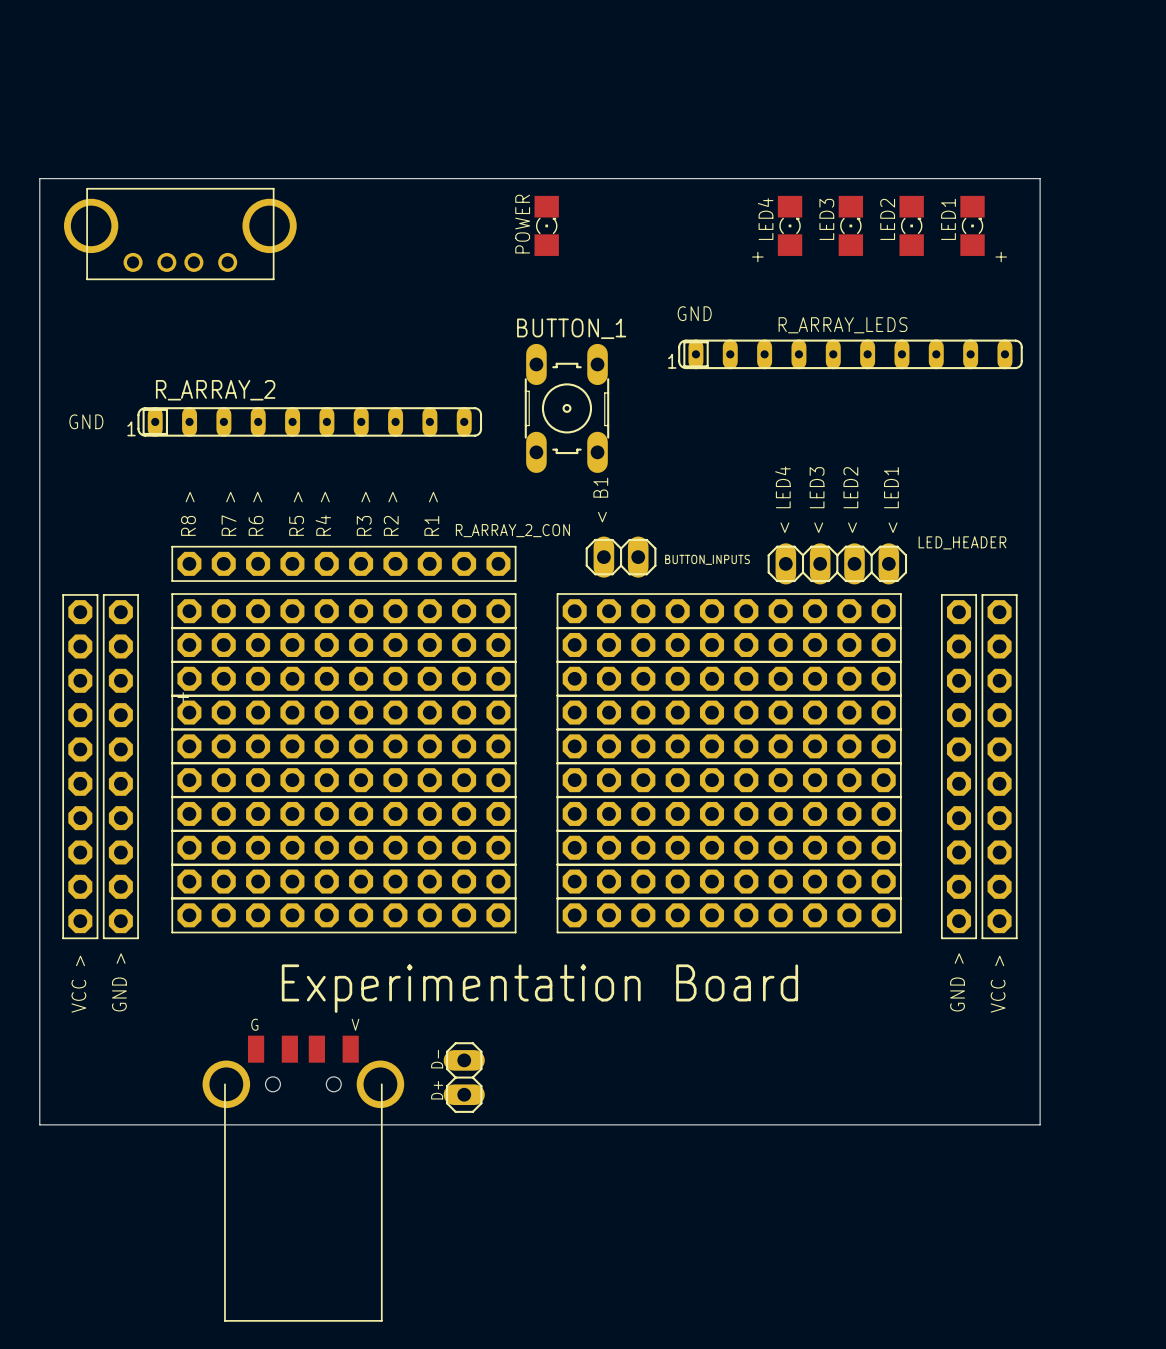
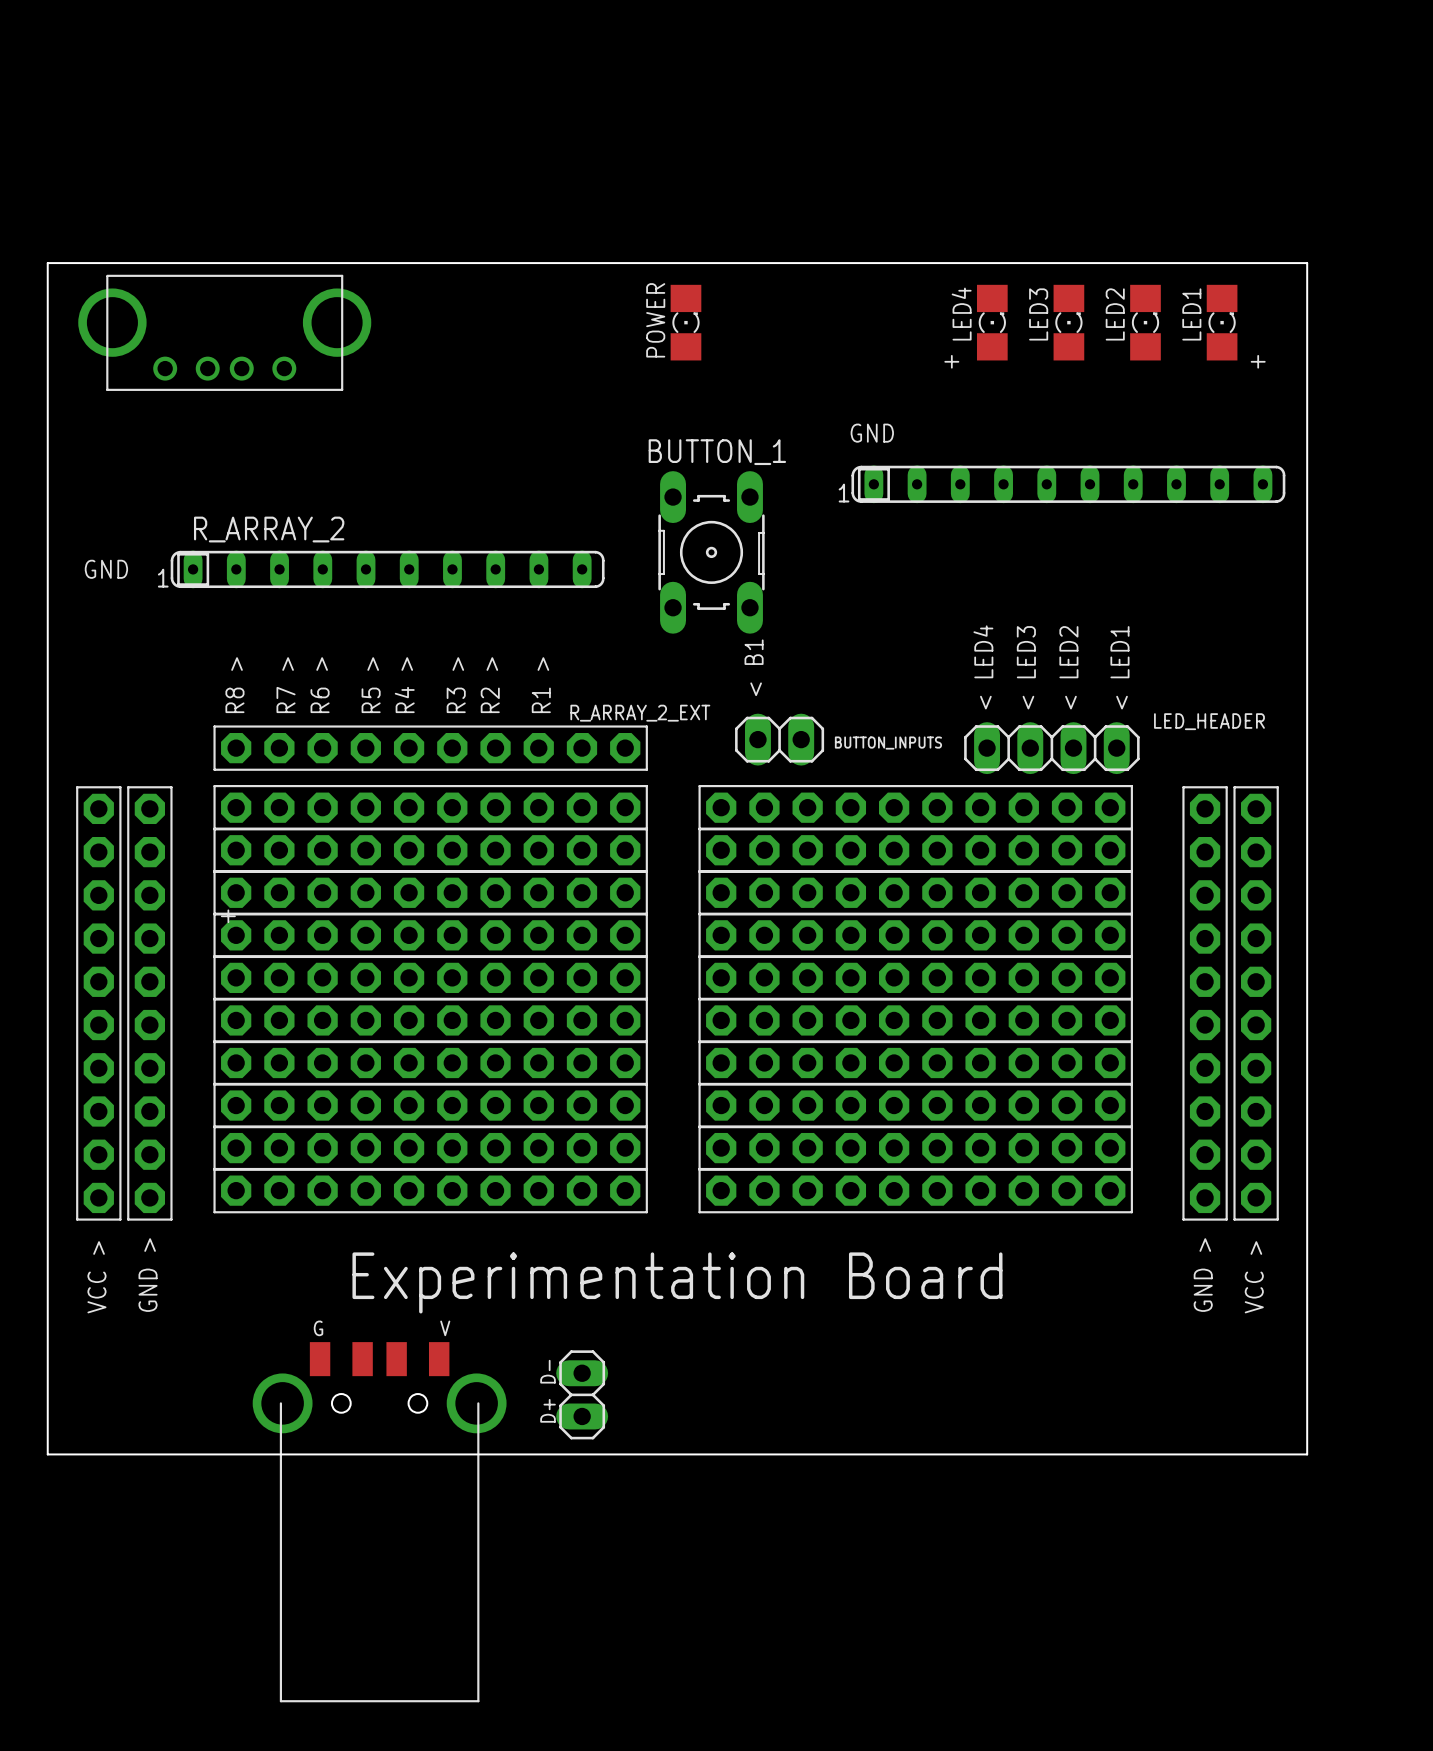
text: R_ARRAY_LEDS (843, 325) -> none
R_ARRAY_2_CON name: R_ARRAY_2_CON (512, 530) -> R_ARRAY_2_EXT (640, 713)

